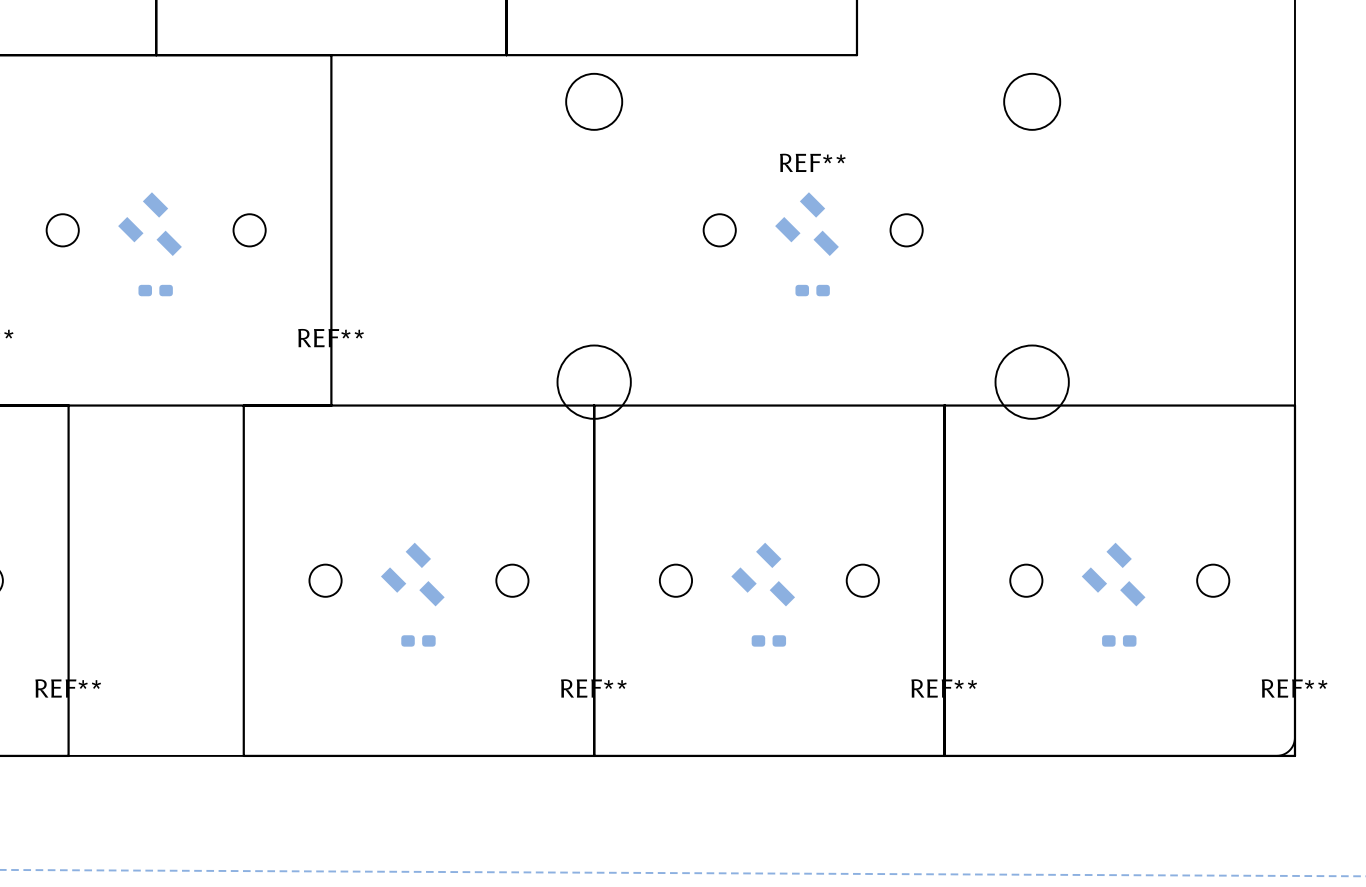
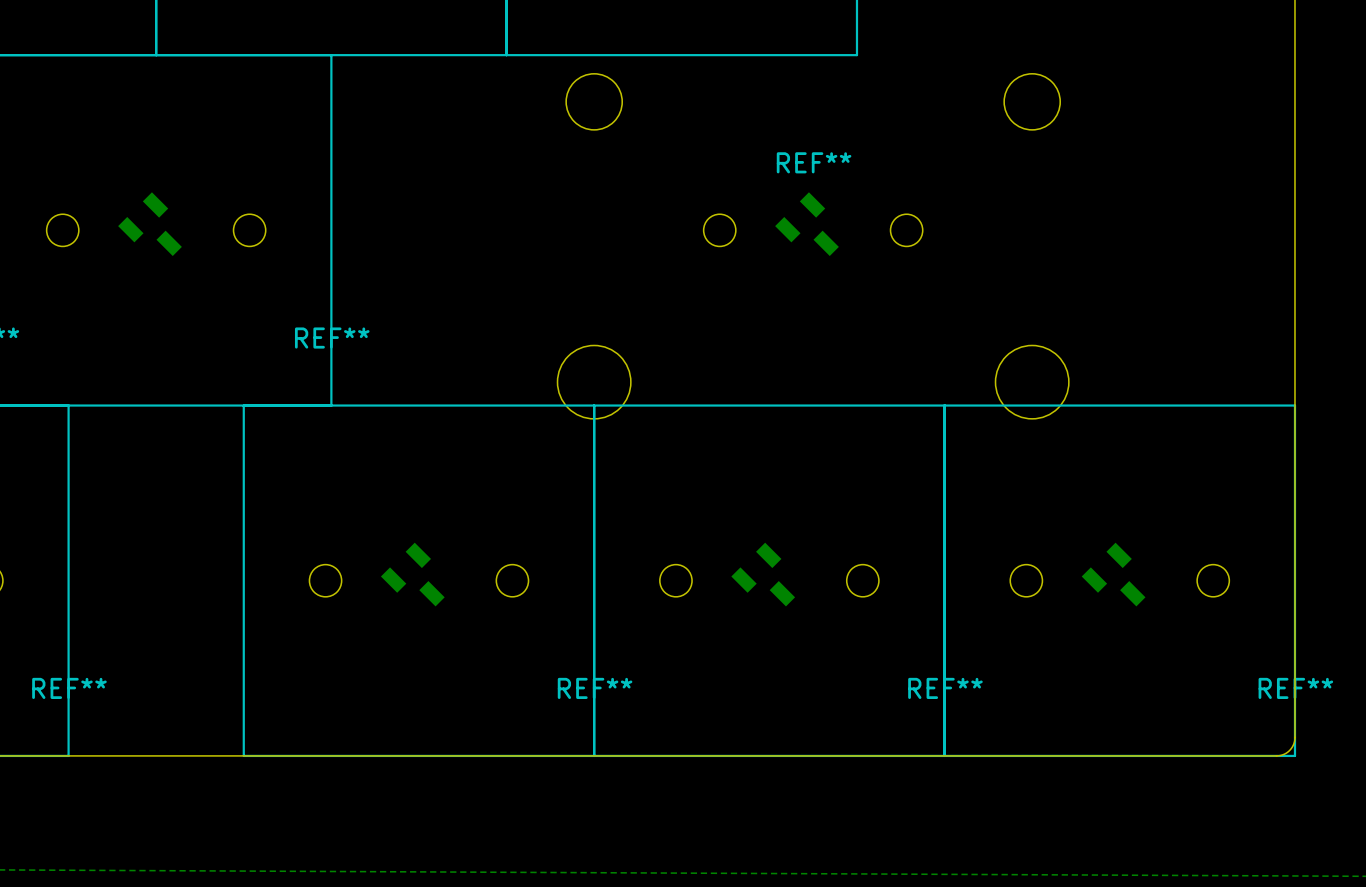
part: (155, 290) -> none
part: (812, 290) -> none
part: (418, 640) -> none
part: (768, 640) -> none
part: (1119, 640) -> none

